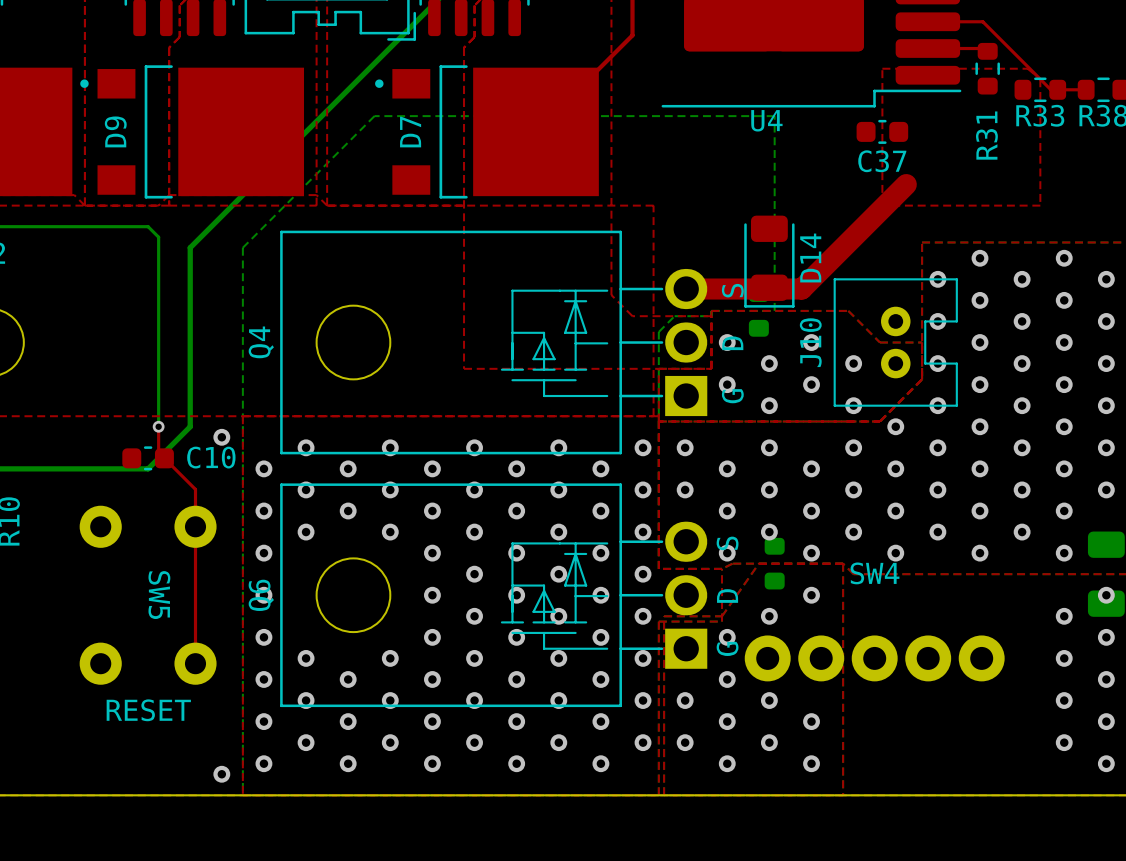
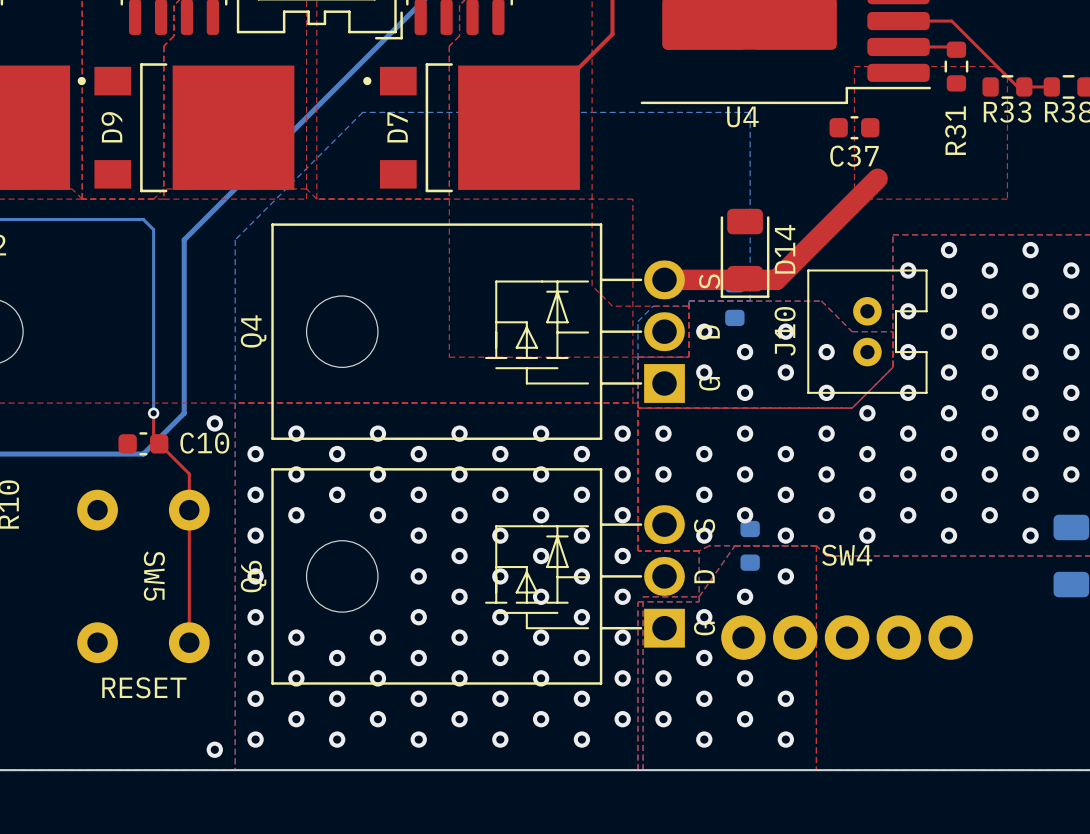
via: (1106, 595) -> none
via: (1064, 616) -> none
via: (1106, 637) -> none
via: (1064, 658) -> none
via: (1106, 679) -> none
via: (1064, 700) -> none
via: (1106, 721) -> none
via: (1064, 742) -> none
via: (1106, 763) -> none

